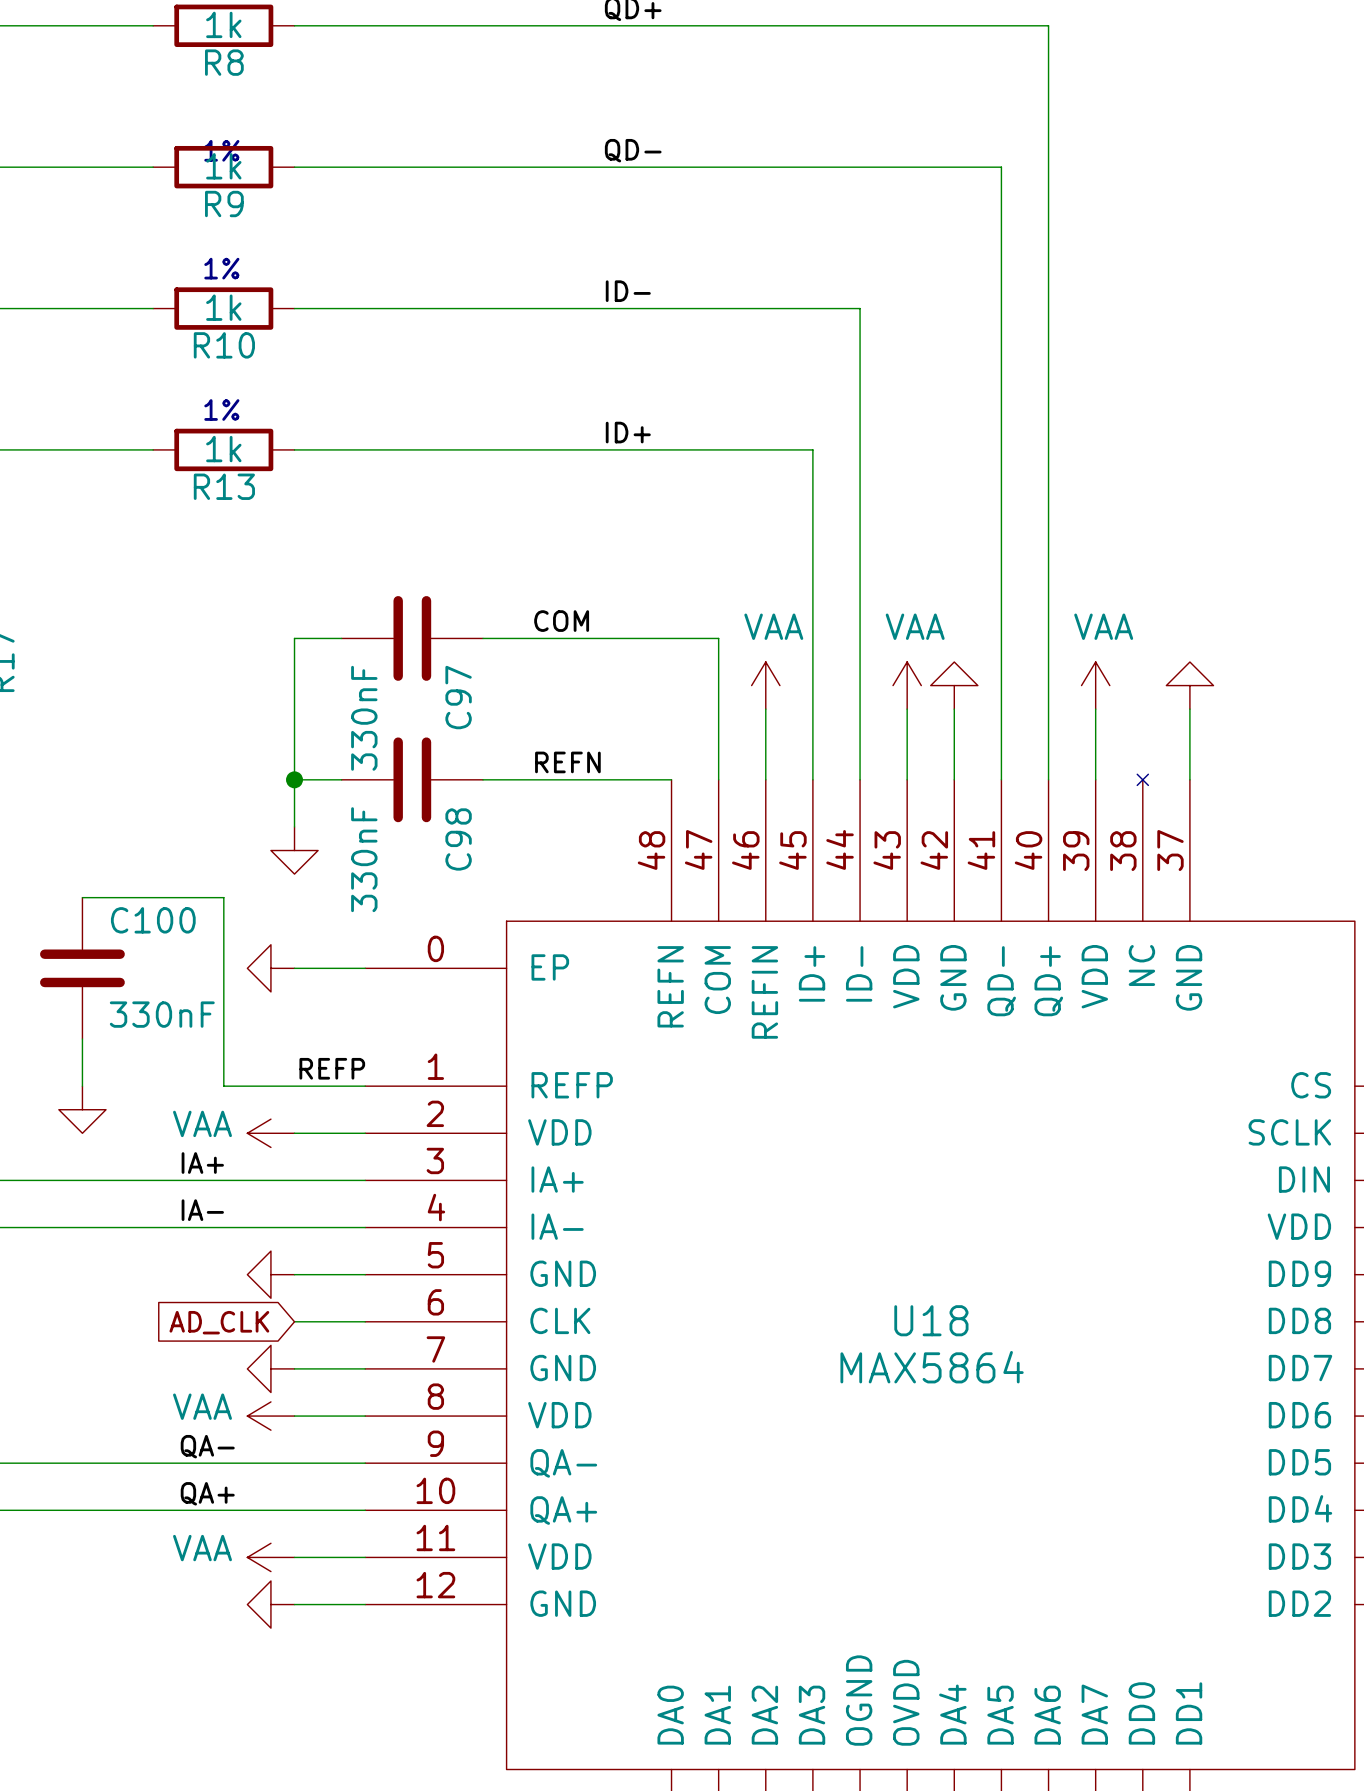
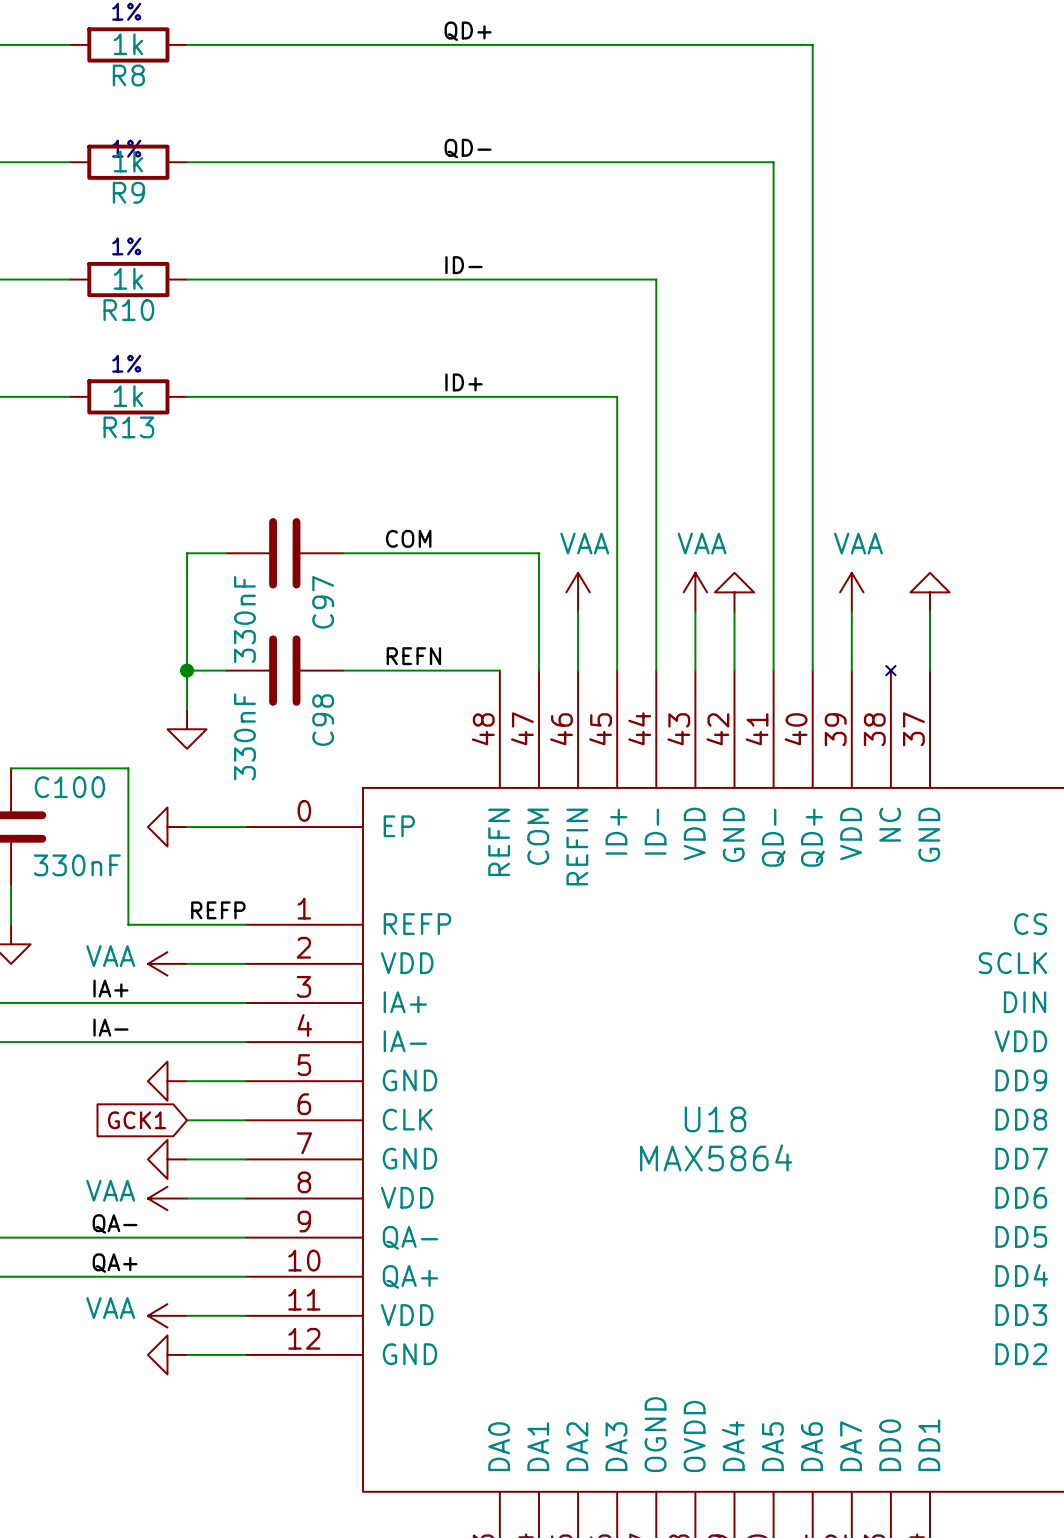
global label: AD_CLK (219, 1322) -> GCK1 (136, 1120)

